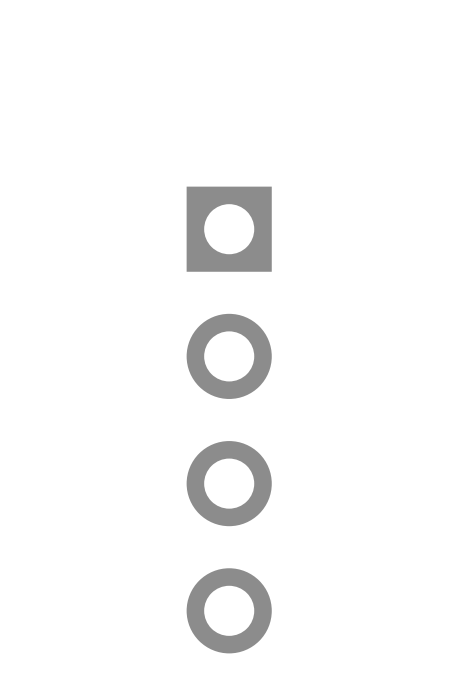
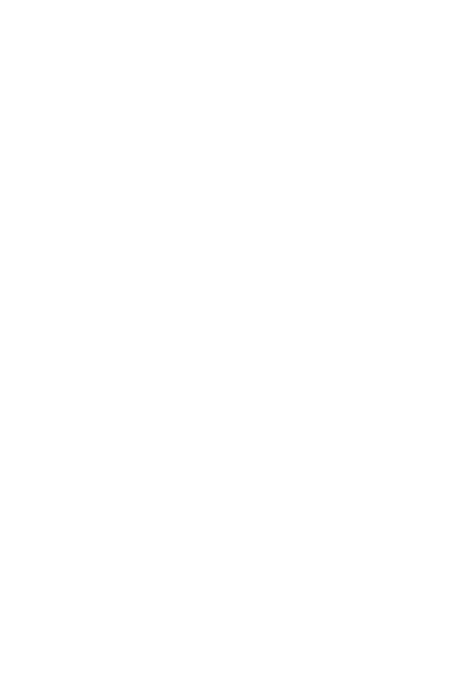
part: (229, 420) -> none

